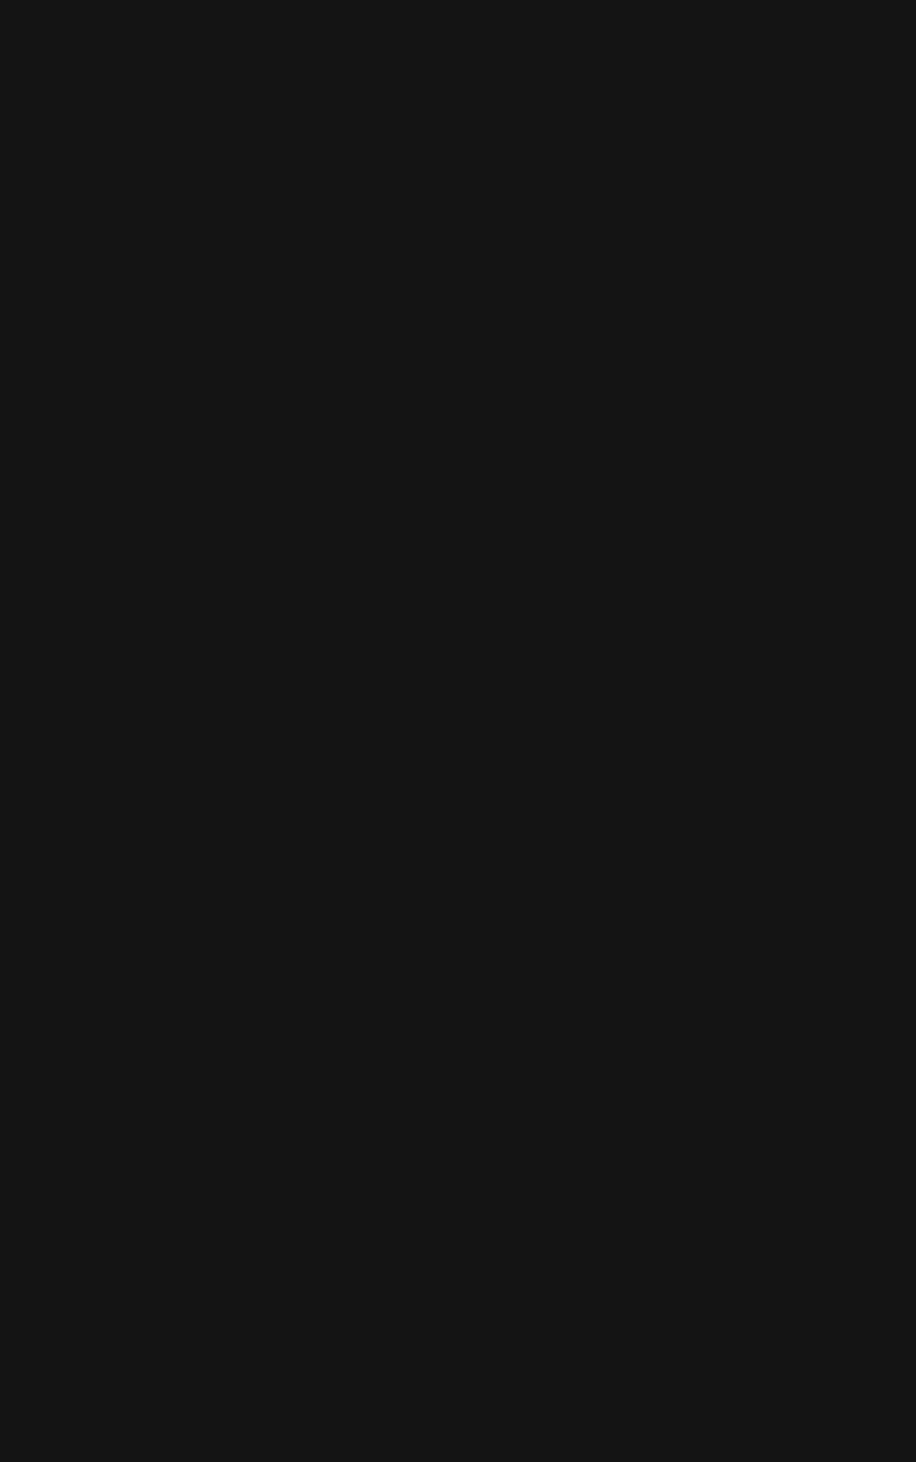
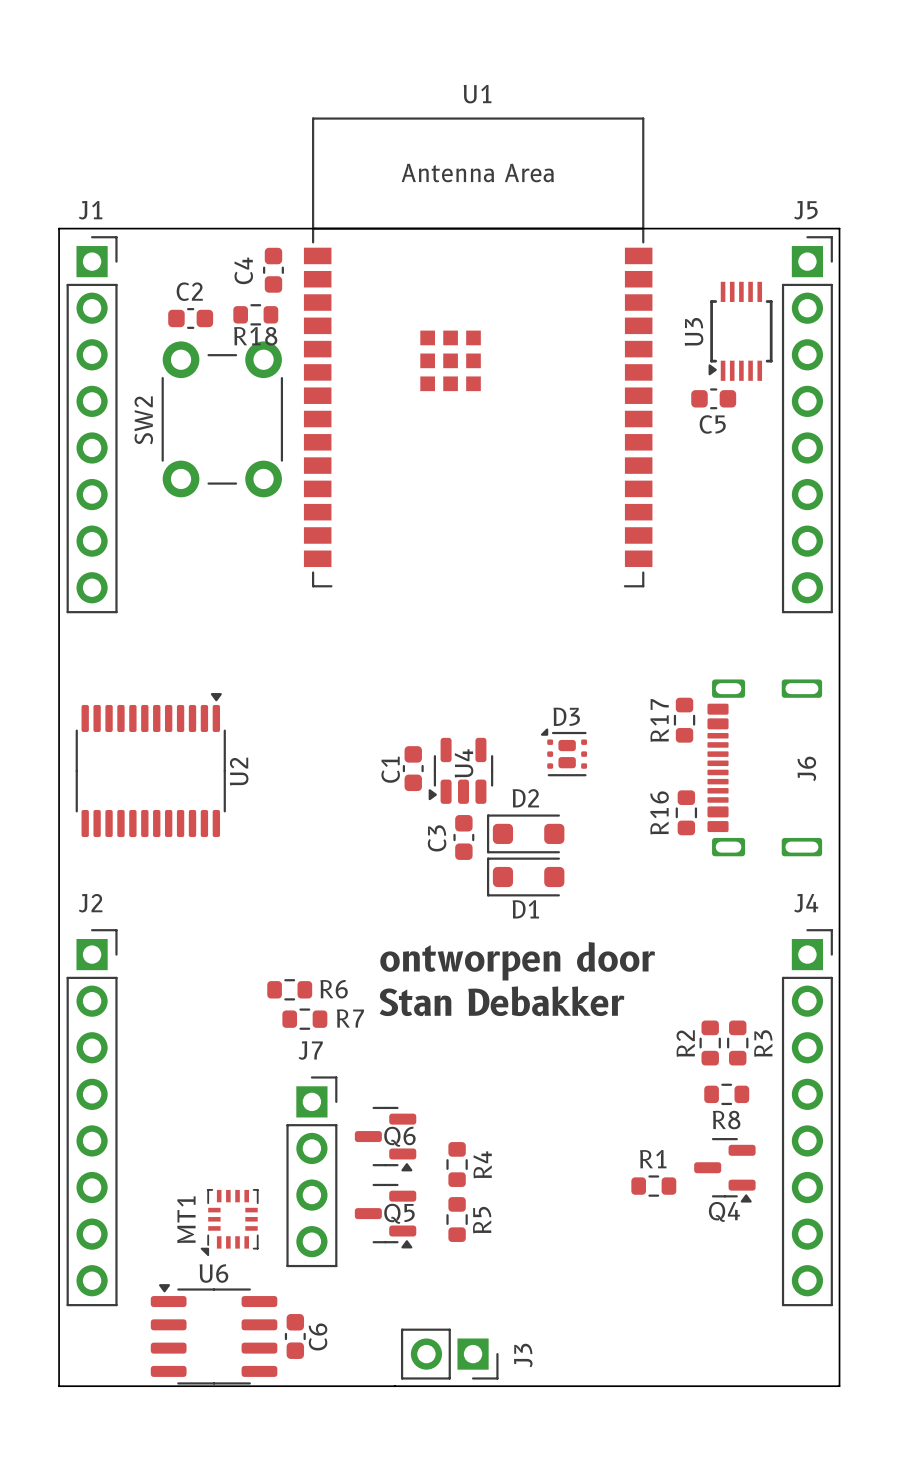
board edge: none -> (59, 228) (839, 228) (839, 1386) (59, 1386) (59, 228)
C4: none -> (273, 270)
R18: none -> (255, 314)
C2: none -> (190, 318)
U3: none -> (740, 331)
U1: none -> (478, 352)
C5: none -> (713, 398)
SW2: none -> (222, 419)
J1: none -> (92, 424)
J5: none -> (807, 424)
R17: none -> (684, 720)
D3: none -> (564, 752)
U2: none -> (150, 765)
J6: none -> (764, 767)
C1: none -> (413, 768)
U4: none -> (460, 770)
R16: none -> (686, 812)
D2: none -> (525, 833)
C3: none -> (463, 837)
D1: none -> (525, 877)
text: none -> ontworpen door (517, 961)
R6: none -> (289, 989)
text: none -> Stan Debakker (501, 1001)
R7: none -> (304, 1019)
R2: none -> (710, 1043)
R3: none -> (737, 1043)
R8: none -> (726, 1094)
J2: none -> (92, 1117)
J4: none -> (807, 1117)
Q6: none -> (385, 1139)
R4: none -> (457, 1164)
Q4: none -> (724, 1170)
J7: none -> (311, 1171)
R1: none -> (653, 1186)
Q5: none -> (385, 1216)
R5: none -> (457, 1219)
MT1: none -> (229, 1222)
U6: none -> (214, 1334)
C6: none -> (295, 1336)
J3: none -> (449, 1354)

